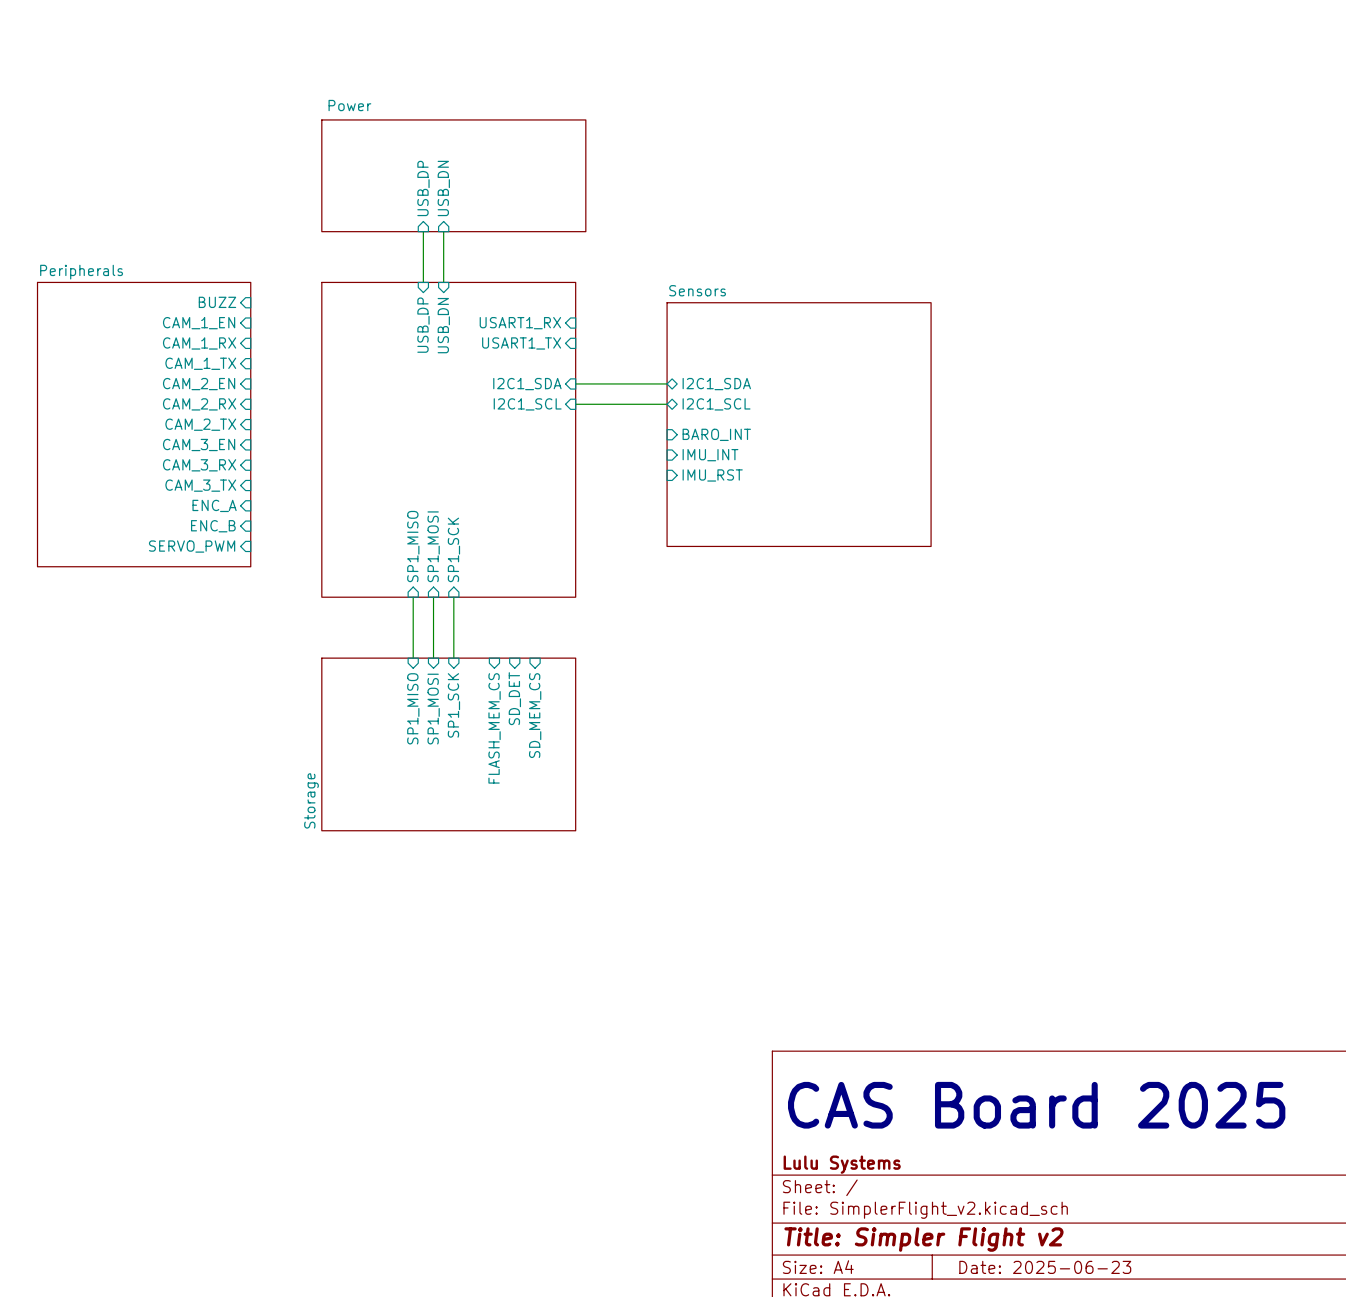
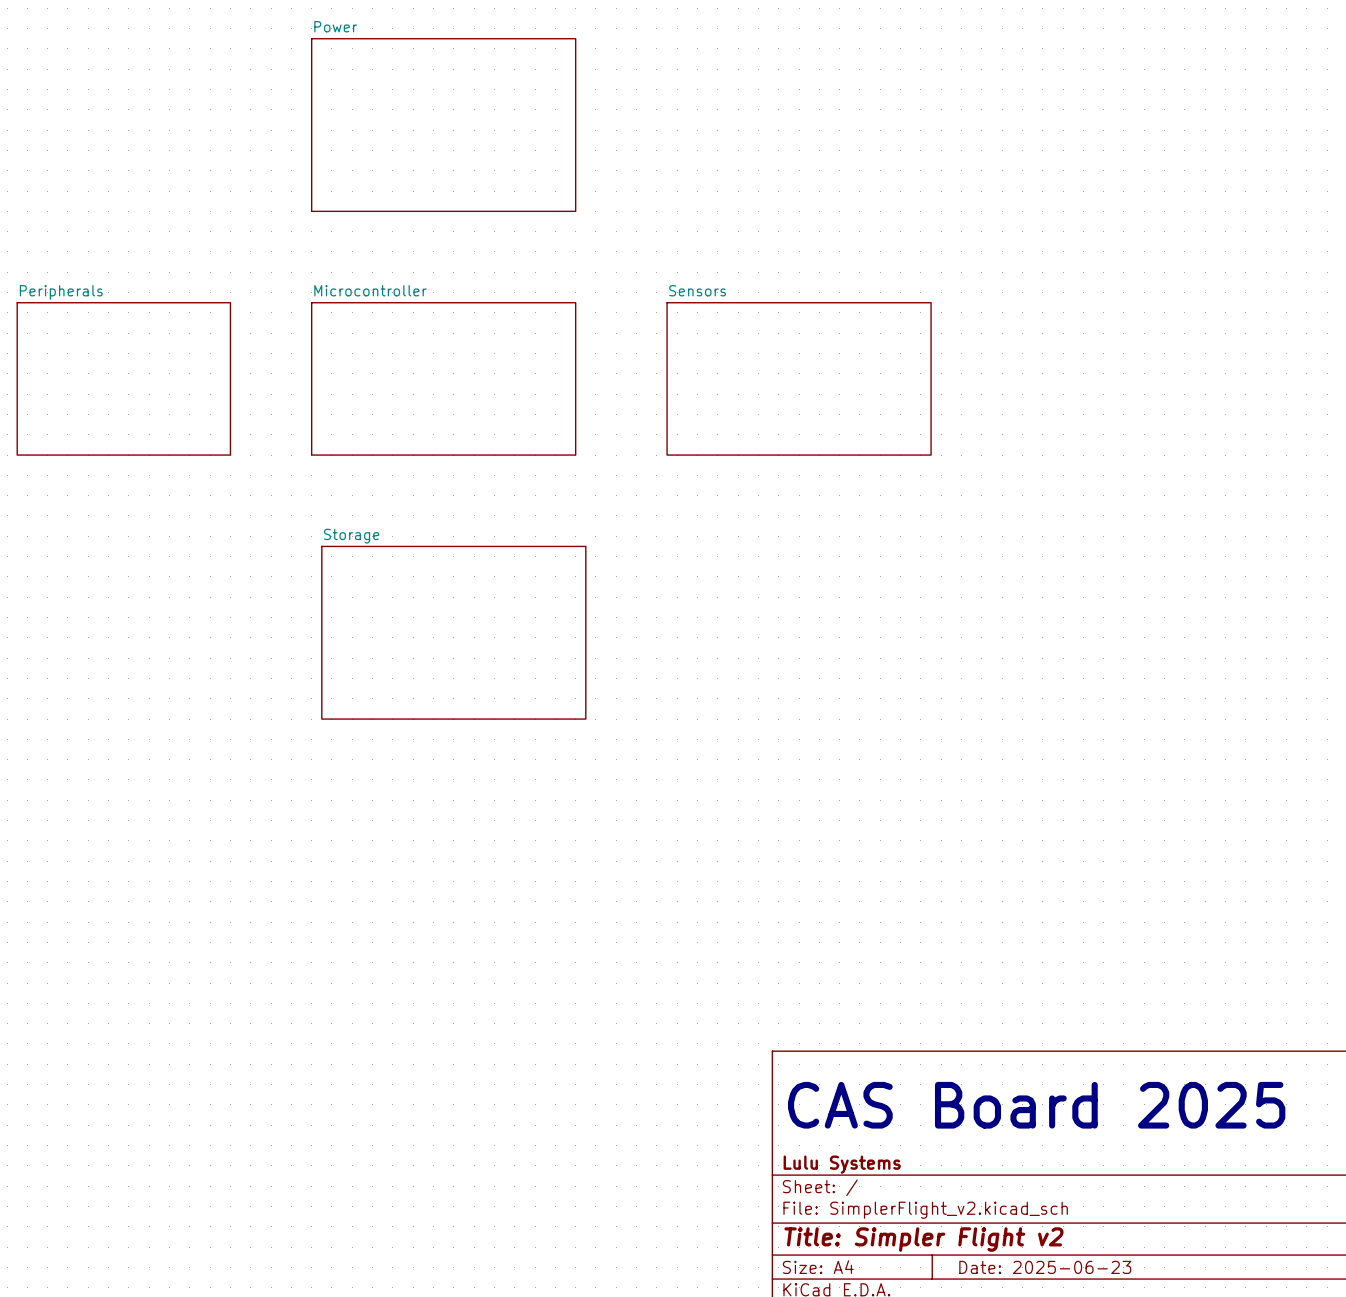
sheet Power: none -> (443, 125)
sheet Power: (453, 175) -> none
sheet pin: USB_DP (423, 188) -> none
sheet pin: USB_DN (443, 188) -> none
wire: (423, 231) (423, 282) -> none
wire: (443, 231) (443, 282) -> none
sheet pin: BUZZ (217, 302) -> none
sheet pin: CAM_1_EN (199, 323) -> none
sheet pin: USART1_RX (520, 323) -> none
sheet pin: USB_DP (423, 325) -> none
sheet pin: USB_DN (443, 325) -> none
sheet pin: CAM_1_RX (199, 343) -> none
sheet pin: USART1_TX (521, 343) -> none
sheet pin: CAM_1_TX (200, 363) -> none
sheet Peripherals: none -> (123, 378)
sheet Microcontroller: none -> (443, 378)
sheet Sensors: none -> (799, 378)
wire: (575, 383) (667, 383) -> none
sheet pin: CAM_2_EN (199, 384) -> none
sheet pin: I2C1_SDA (527, 384) -> none
sheet pin: I2C1_SDA (716, 384) -> none
sheet pin: CAM_2_RX (199, 404) -> none
sheet pin: I2C1_SCL (527, 404) -> none
wire: (575, 404) (667, 404) -> none
sheet pin: I2C1_SCL (716, 404) -> none
sheet Peripherals: (144, 424) -> none
sheet pin: CAM_2_TX (200, 424) -> none
sheet Sensors: (799, 424) -> none
sheet pin: BARO_INT (716, 434) -> none
sheet: (448, 439) -> none
sheet pin: CAM_3_EN (199, 445) -> none
sheet pin: IMU_INT (710, 455) -> none
sheet pin: CAM_3_RX (199, 465) -> none
sheet pin: IMU_RST (712, 475) -> none
sheet pin: CAM_3_TX (200, 485) -> none
sheet pin: ENC_A (214, 505) -> none
sheet pin: ENC_B (213, 526) -> none
sheet pin: SERVO_PWM (192, 546) -> none
sheet pin: SP1_MISO (413, 546) -> none
sheet pin: SP1_MOSI (433, 546) -> none
sheet pin: SP1_SCK (453, 549) -> none
wire: (413, 597) (413, 658) -> none
wire: (433, 597) (433, 658) -> none
wire: (453, 597) (453, 658) -> none
sheet Storage: none -> (453, 632)
sheet pin: SD_DET (514, 698) -> none
sheet pin: SP1_SCK (453, 705) -> none
sheet pin: SP1_MISO (413, 708) -> none
sheet pin: SP1_MOSI (433, 709) -> none
sheet pin: SD_MEM_CS (535, 715) -> none
sheet pin: FLASH_MEM_CS (494, 728) -> none
sheet Storage: (448, 744) -> none

